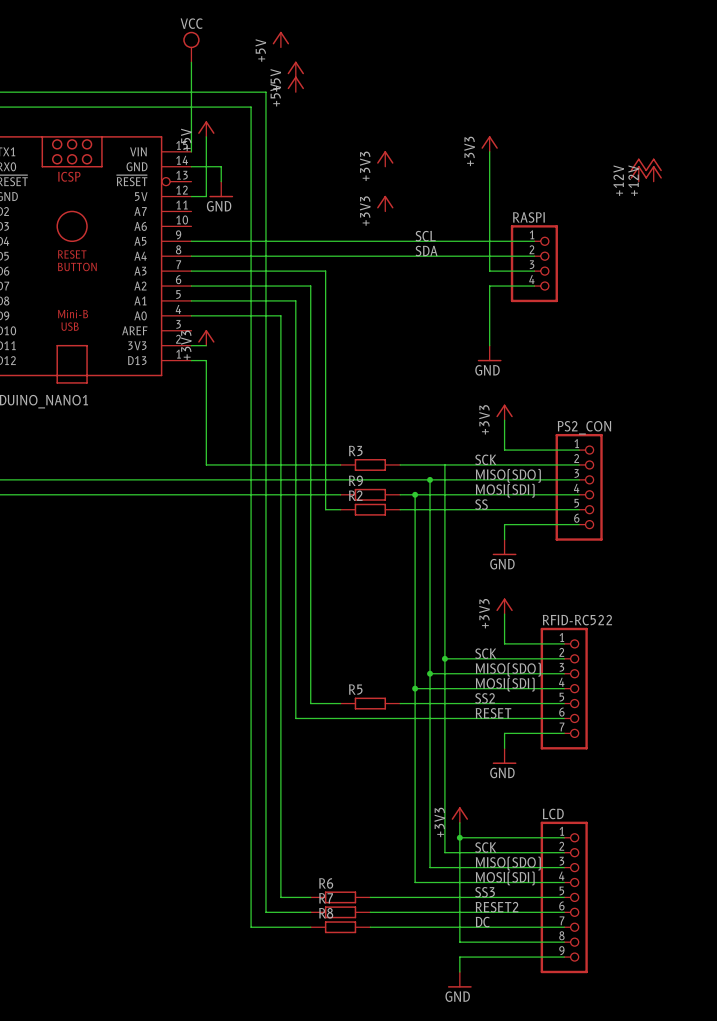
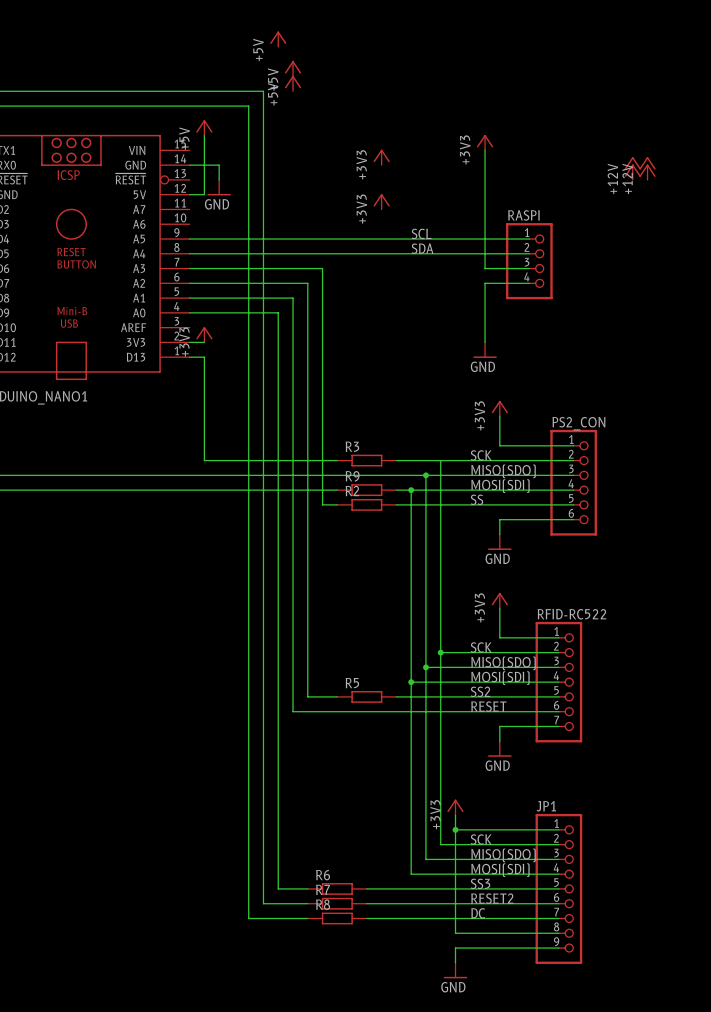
power symbol: VCC (191, 47) -> none
wire: (191, 62) (191, 151) -> none
LCD name: LCD (553, 813) -> JP1 (546, 806)

